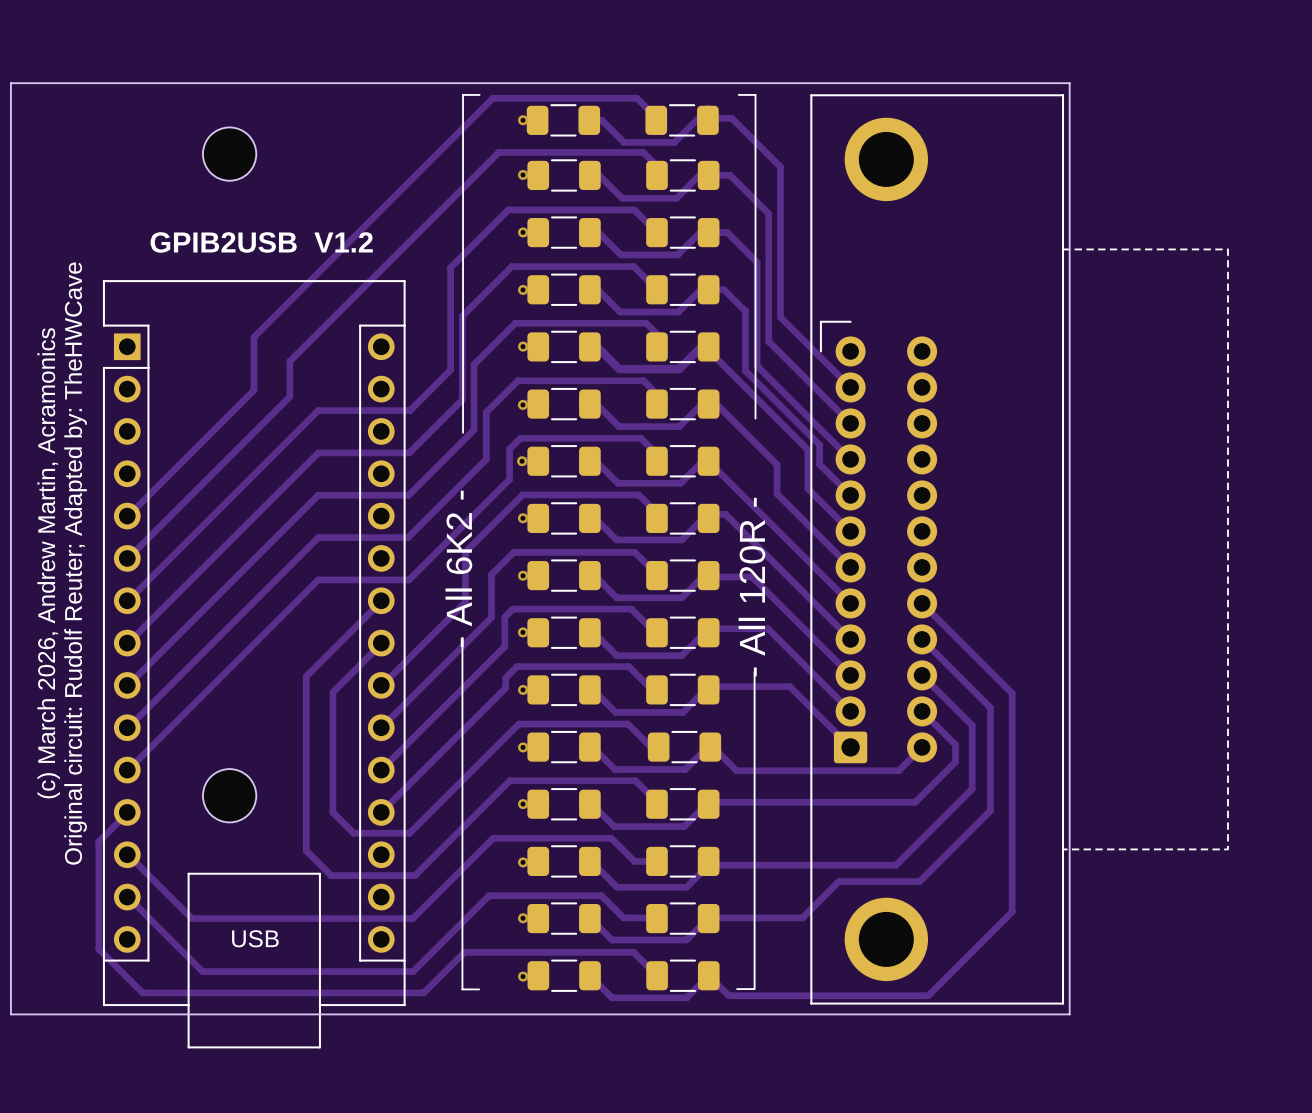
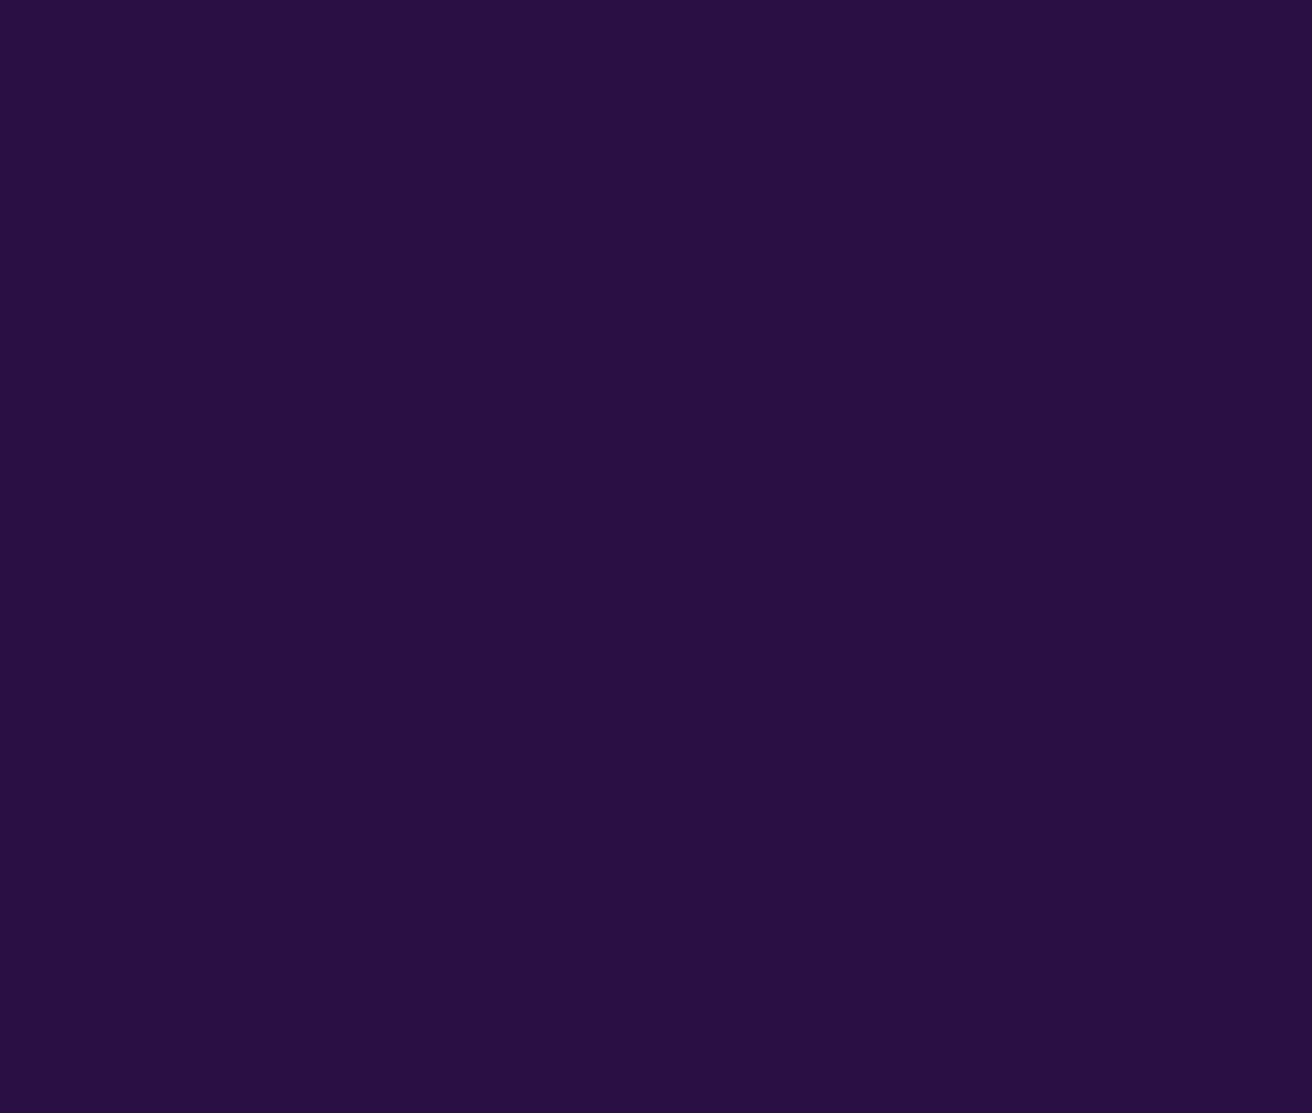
board edge: (10, 83) (1069, 83) (1069, 1014) (10, 1014) (10, 83) -> none
line: (462, 94) (479, 94) -> none
line: (463, 94) (463, 432) -> none
line: (738, 94) (755, 94) -> none
line: (755, 94) (755, 418) -> none
track: (708, 108) (674, 142) (624, 142) (601, 120) (589, 120) -> none
track: (656, 118) (636, 98) (492, 98) (254, 337) (254, 390) (128, 516) -> none
track: (708, 118) (731, 118) (780, 166) (780, 317) (850, 387) -> none
via: (523, 120) -> none
part: (563, 120) -> none
part: (682, 120) -> none
part: (229, 154) -> none
track: (589, 166) (622, 198) (676, 198) (708, 166) -> none
track: (656, 166) (643, 152) (498, 152) (289, 361) (289, 396) (128, 558) -> none
via: (523, 174) -> none
part: (564, 175) -> none
part: (682, 175) -> none
track: (708, 175) (730, 175) (768, 213) (768, 341) (850, 423) -> none
track: (589, 223) (620, 254) (677, 254) (708, 223) -> none
via: (523, 232) -> none
part: (564, 232) -> none
track: (656, 232) (634, 209) (508, 209) (450, 267) (450, 369) (410, 410) (318, 410) (128, 600) -> none
part: (682, 232) -> none
track: (708, 232) (727, 232) (757, 262) (757, 365) (850, 459) -> none
text: GPIB2USB V1.2 (261, 242) -> none
track: (589, 281) (620, 312) (678, 312) (708, 281) -> none
via: (523, 289) -> none
part: (564, 289) -> none
track: (656, 289) (633, 266) (511, 266) (462, 316) (462, 399) (409, 452) (318, 452) (128, 643) -> none
part: (682, 289) -> none
track: (708, 289) (724, 289) (745, 310) (745, 370) (819, 444) (819, 464) (850, 495) -> none
track: (656, 334) (646, 323) (515, 323) (474, 364) (474, 429) (408, 495) (318, 495) (128, 685) -> none
track: (589, 339) (619, 369) (679, 369) (708, 339) -> none
via: (523, 346) -> none
part: (564, 346) -> none
part: (682, 346) -> none
track: (708, 350) (807, 449) (807, 488) (850, 531) -> none
track: (656, 394) (643, 380) (517, 380) (486, 412) (486, 459) (408, 537) (318, 537) (128, 727) -> none
track: (708, 396) (777, 464) (777, 493) (850, 567) -> none
track: (589, 397) (619, 426) (679, 426) (708, 397) -> none
via: (522, 404) -> none
part: (564, 404) -> none
part: (682, 404) -> none
track: (656, 454) (640, 438) (520, 438) (509, 449) (509, 479) (409, 579) (318, 579) (128, 770) -> none
track: (708, 454) (708, 461) (850, 603) (842, 603) -> none
track: (589, 455) (617, 483) (680, 483) (708, 455) -> none
via: (522, 461) -> none
part: (564, 461) -> none
part: (682, 461) -> none
track: (589, 513) (616, 539) (681, 539) (708, 513) -> none
track: (656, 513) (638, 494) (522, 494) (465, 552) (465, 602) (382, 685) -> none
track: (708, 514) (725, 514) (850, 639) -> none
via: (522, 518) -> none
part: (564, 518) -> none
part: (682, 518) -> none
part: (1019, 549) -> none
text: (c) March 2026, Andrew Martin, Acramonics (48, 563) -> none
text: Original circuit: Rudolf Reuter; Adapted by: TheHWCave (75, 563) -> none
text: - All 6K2 - (458, 568) -> none
track: (589, 570) (616, 597) (681, 597) (708, 570) (714, 577) (752, 577) (850, 675) -> none
track: (656, 574) (634, 552) (513, 552) (491, 574) (491, 617) (381, 727) -> none
via: (523, 575) -> none
part: (564, 575) -> none
part: (682, 575) -> none
text: - All 120R - (751, 587) -> none
track: (382, 600) (306, 676) (306, 850) (331, 875) (415, 875) (509, 780) (635, 780) (656, 802) -> none
track: (922, 603) (1012, 693) (1012, 911) (928, 995) (728, 995) (708, 975) (686, 997) (612, 997) (590, 975) -> none
track: (589, 628) (616, 655) (681, 655) (708, 628) (767, 628) (850, 711) -> none
via: (522, 632) -> none
part: (564, 632) -> none
part: (682, 632) -> none
track: (656, 634) (631, 609) (512, 609) (504, 617) (504, 646) (381, 770) -> none
line: (462, 637) (462, 989) (479, 989) -> none
track: (922, 639) (990, 707) (990, 810) (919, 881) (838, 881) (802, 917) (708, 917) (686, 940) (611, 940) (589, 917) -> none
track: (382, 643) (332, 692) (332, 812) (353, 833) (409, 833) (518, 724) (627, 724) (658, 754) -> none
part: (254, 664) -> none
line: (754, 672) (754, 988) -> none
track: (922, 675) (972, 725) (972, 788) (895, 865) (708, 865) (686, 887) (617, 887) (589, 860) -> none
track: (589, 686) (615, 712) (682, 712) (708, 686) (789, 686) (850, 747) -> none
via: (523, 689) -> none
part: (564, 689) -> none
part: (682, 689) -> none
track: (656, 694) (628, 666) (517, 666) (505, 678) (505, 688) (381, 812) -> none
track: (922, 711) (955, 744) (955, 762) (915, 802) (708, 802) (684, 826) (614, 826) (589, 802) -> none
track: (589, 744) (614, 769) (685, 769) (710, 744) (736, 770) (898, 770) (922, 747) -> none
via: (523, 747) -> none
part: (564, 747) -> none
part: (684, 747) -> none
part: (229, 795) -> none
via: (523, 804) -> none
part: (564, 804) -> none
part: (682, 804) -> none
track: (128, 812) (98, 841) (98, 949) (142, 992) (423, 992) (464, 952) (633, 952) (657, 975) -> none
track: (128, 854) (191, 918) (412, 918) (493, 838) (611, 838) (634, 861) (656, 861) -> none
part: (564, 861) -> none
part: (682, 861) -> none
via: (523, 862) -> none
track: (128, 897) (202, 971) (413, 971) (489, 895) (601, 895) (623, 917) (656, 917) -> none
via: (523, 918) -> none
part: (564, 918) -> none
part: (682, 918) -> none
part: (564, 975) -> none
part: (682, 975) -> none
via: (523, 976) -> none
line: (737, 989) (754, 989) -> none

